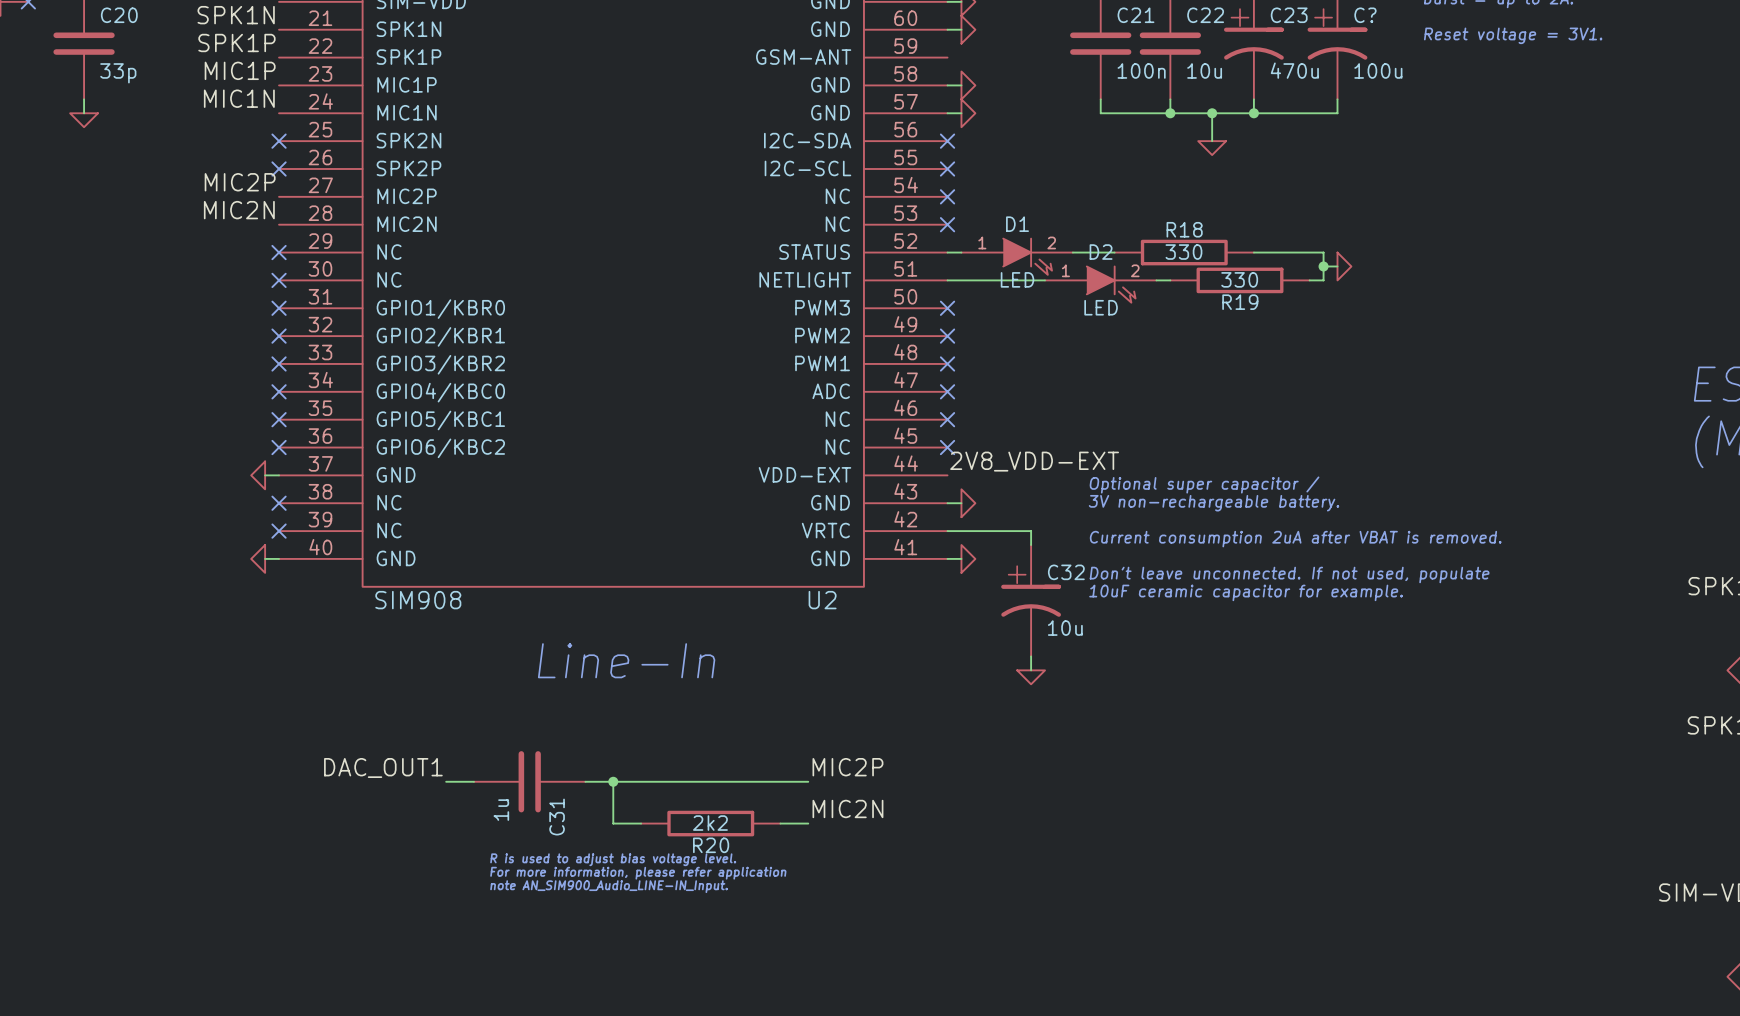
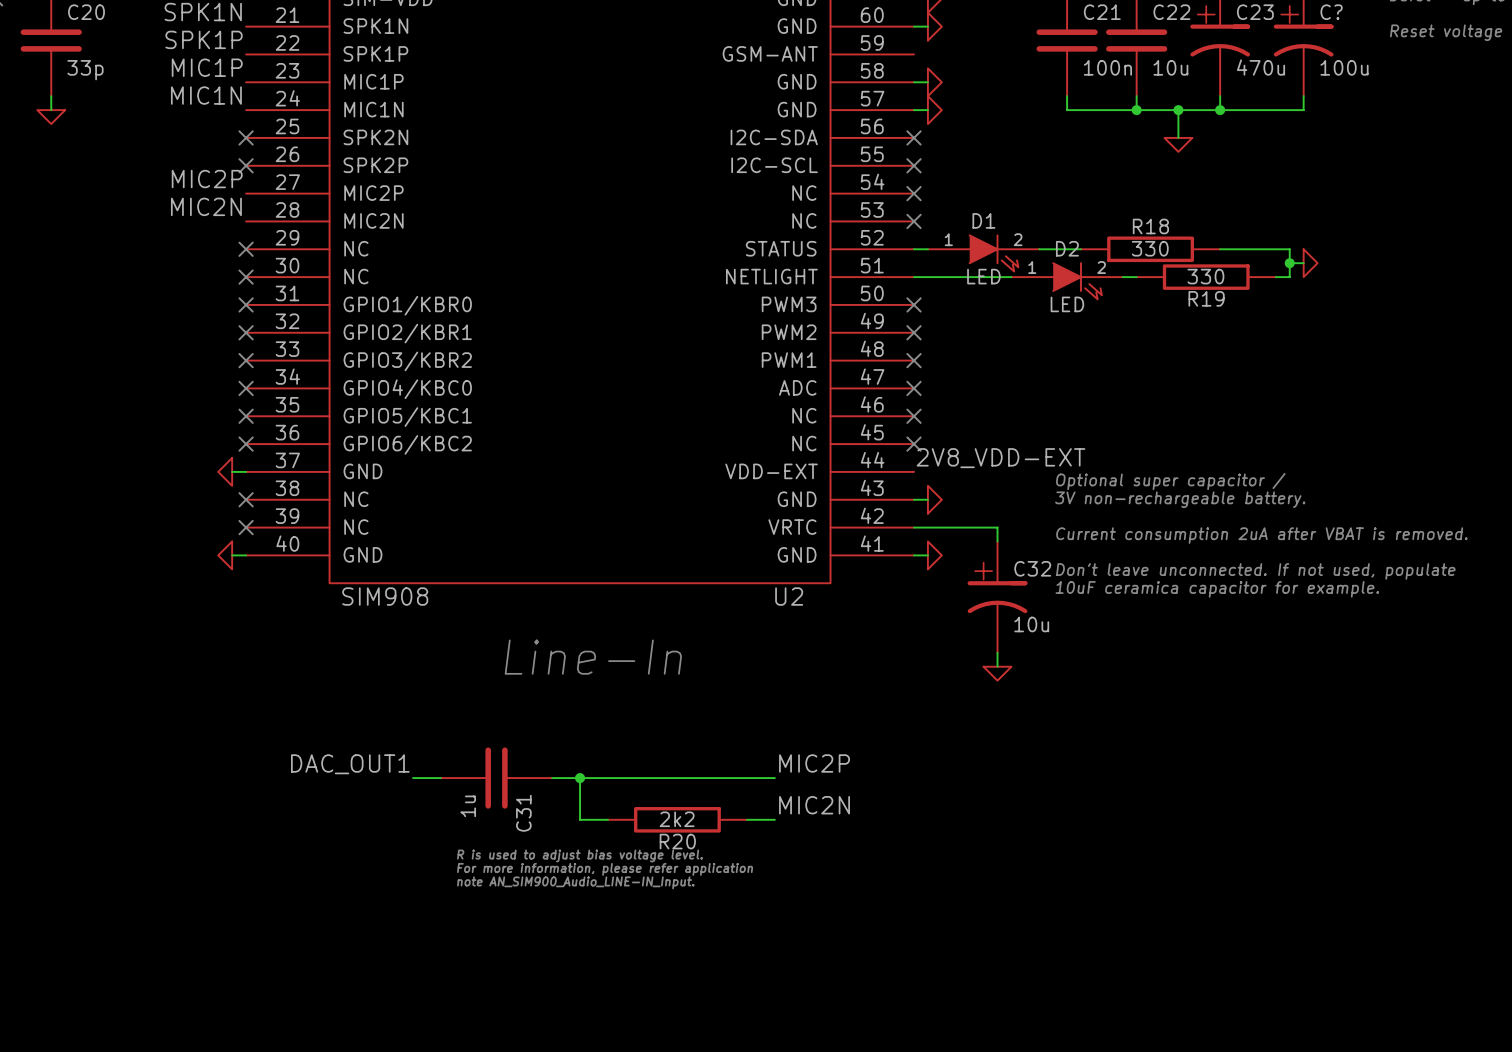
text: 10uF ceramic capacitor for example. (1246, 592) -> 10uF ceramica capacitor for example. (1217, 589)

